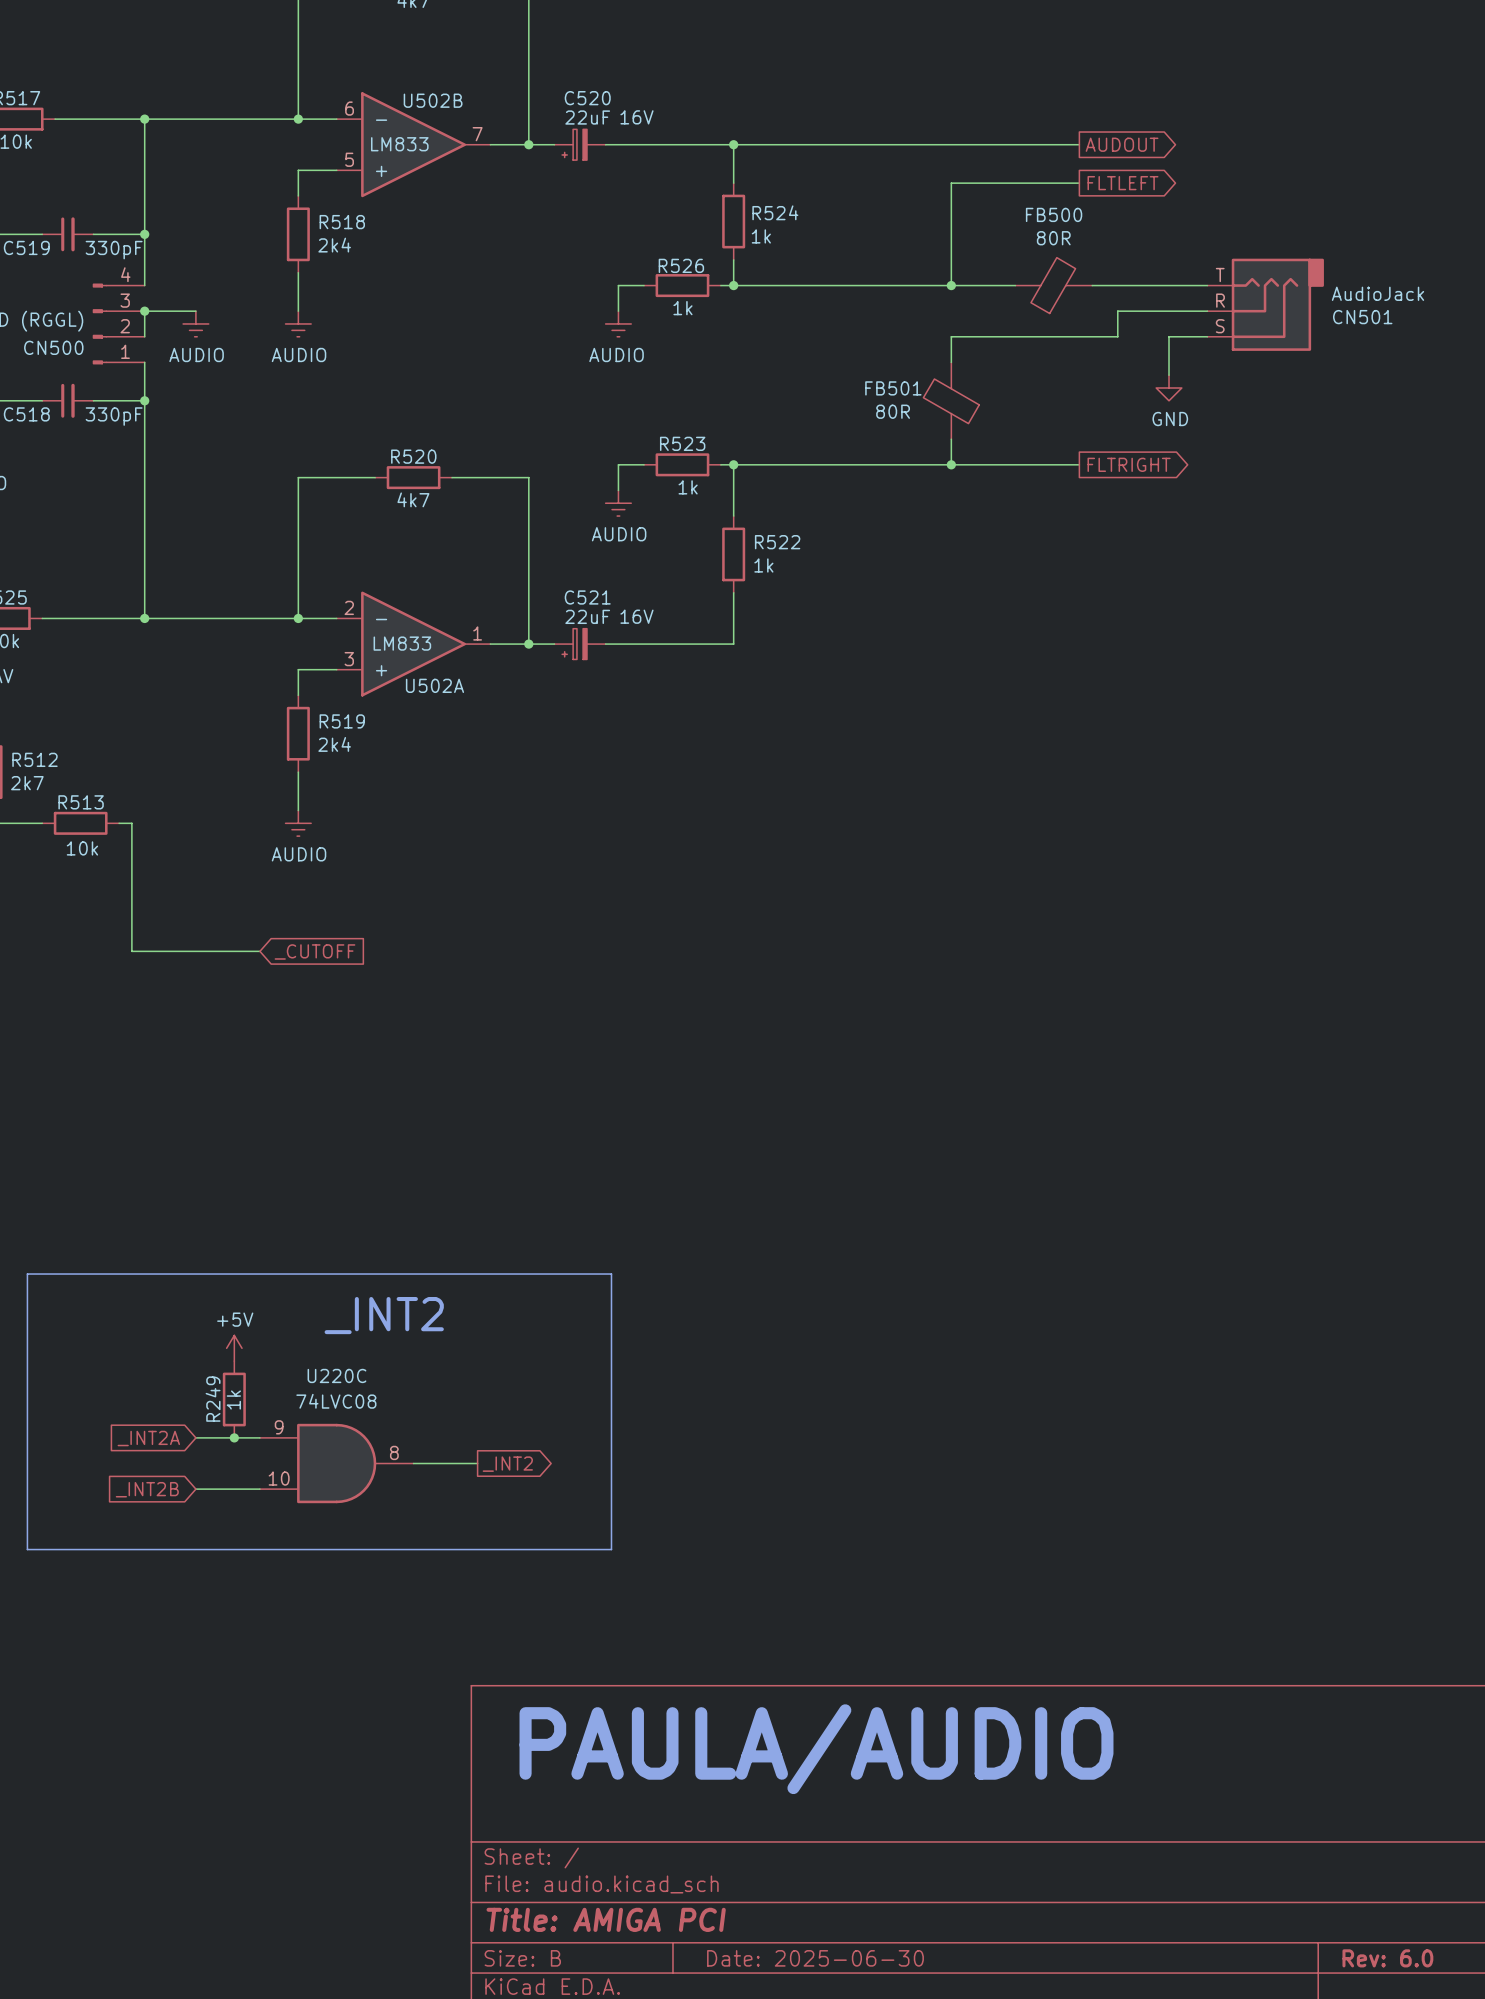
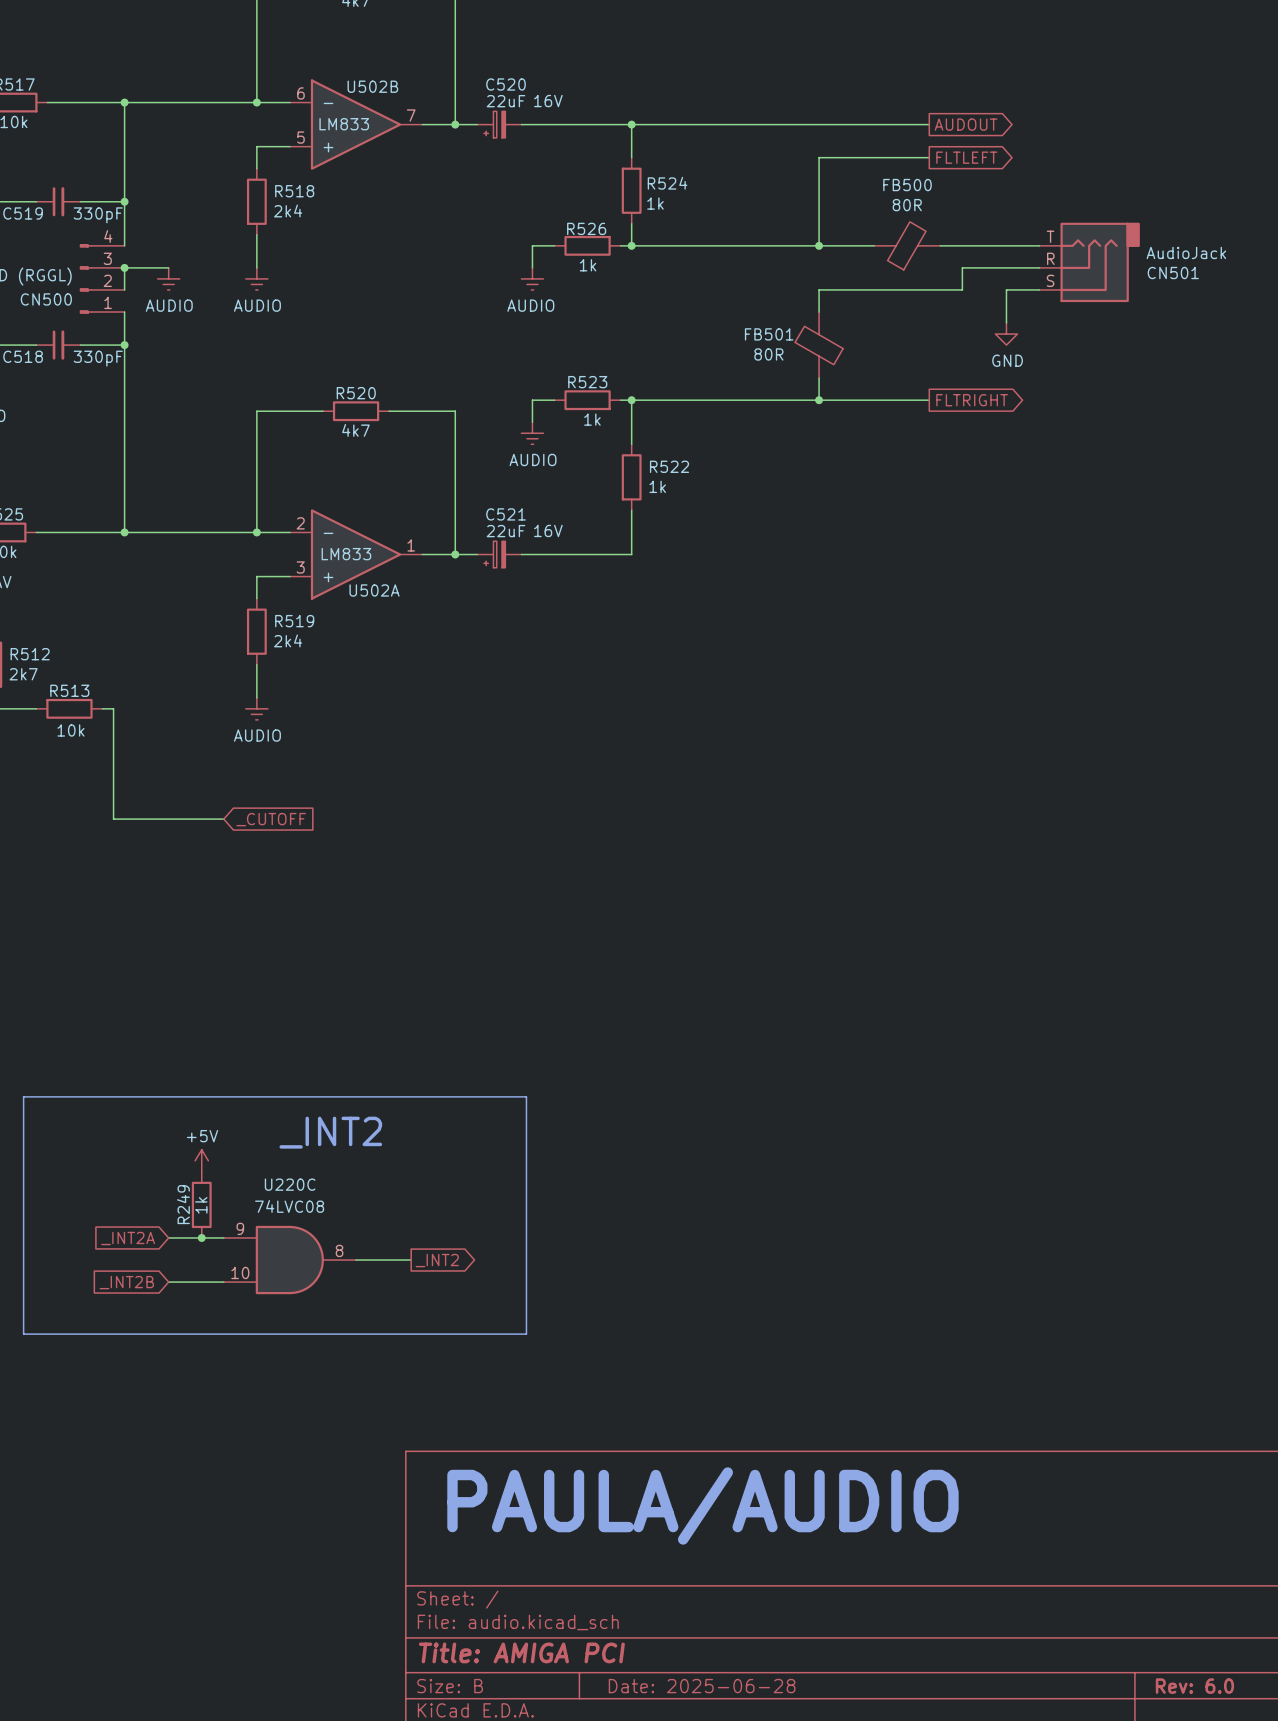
title block: Date: 2025-06-30 (815, 1958) -> Date: 2025-06-28 (702, 1686)

